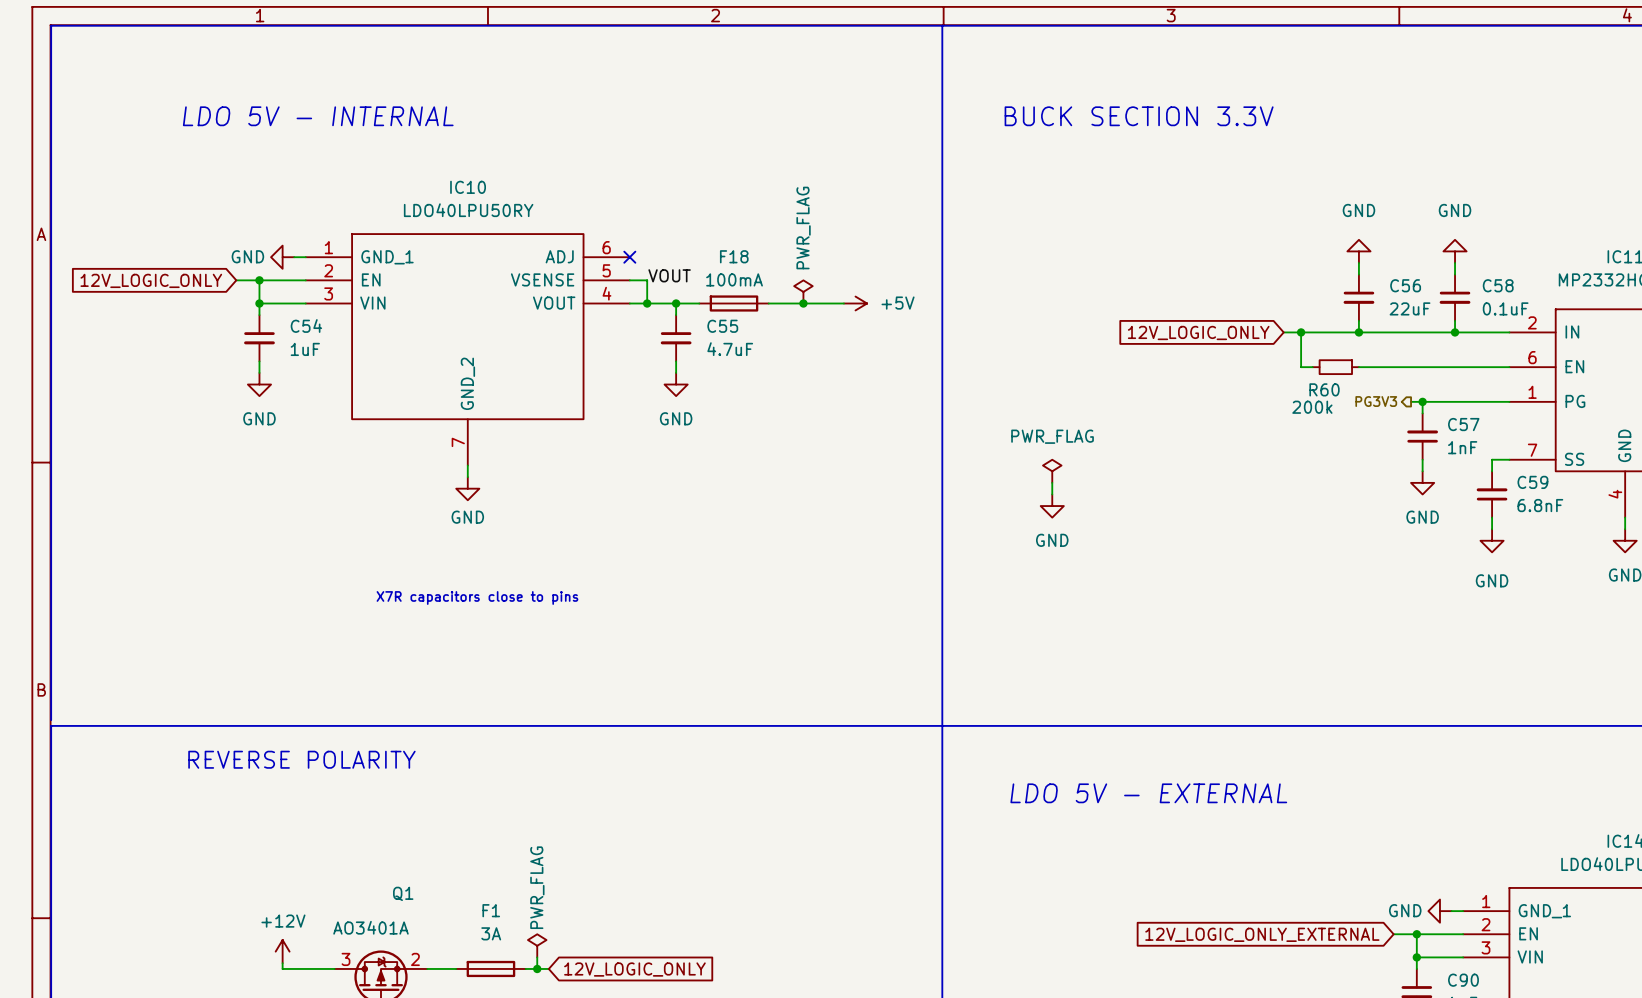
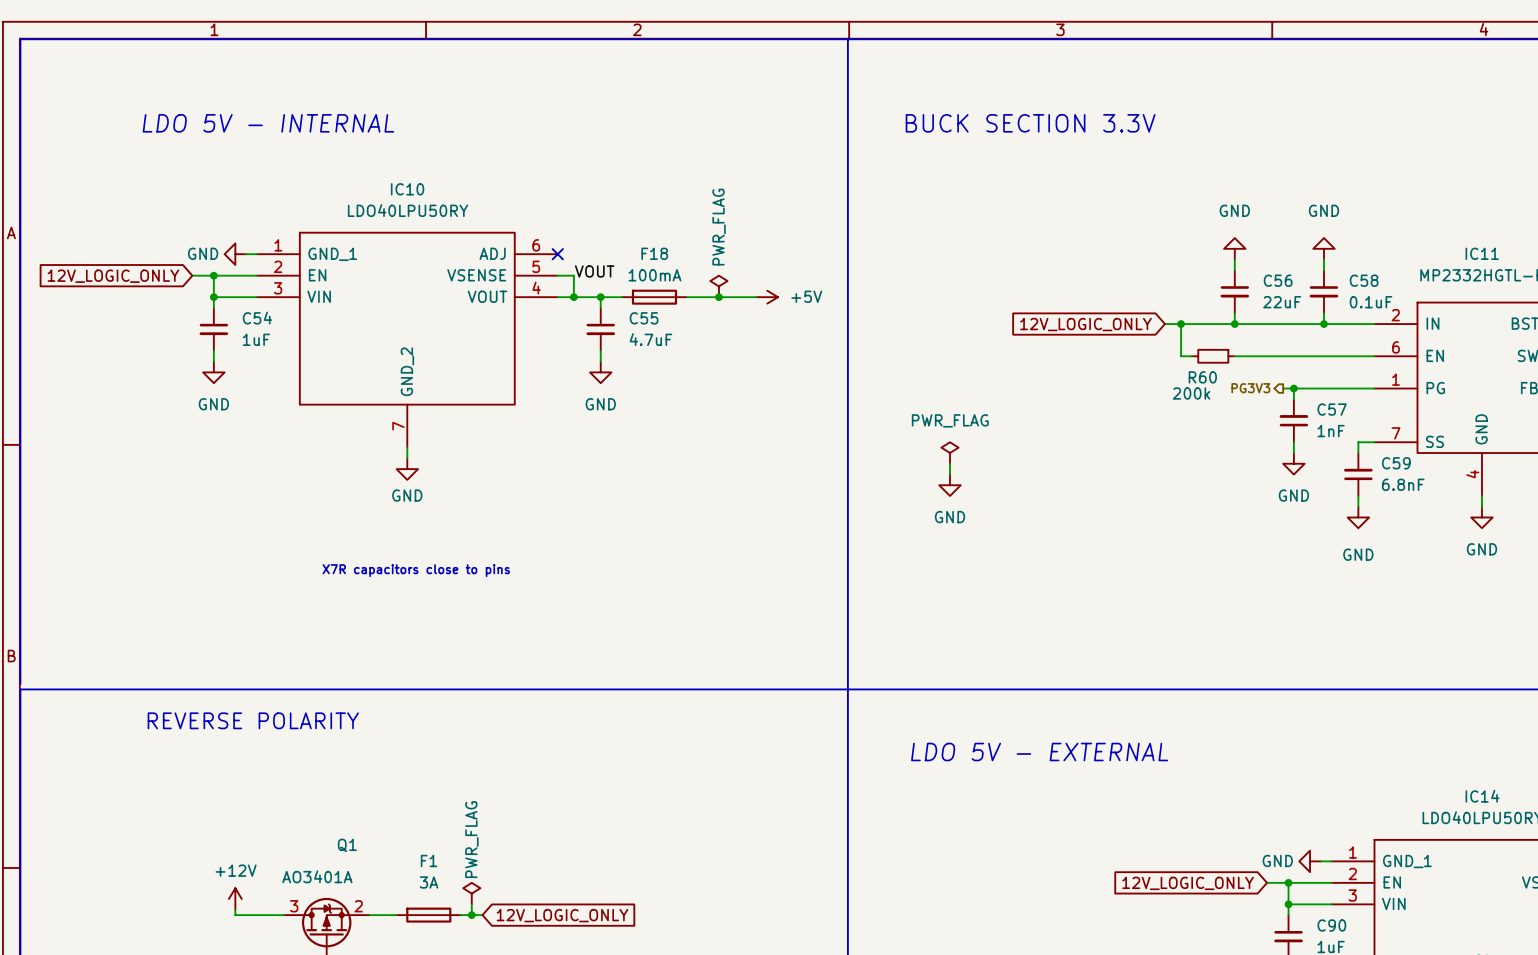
global label: 12V_LOGIC_ONLY_EXTERNAL (1262, 934) -> 12V_LOGIC_ONLY (1188, 883)

